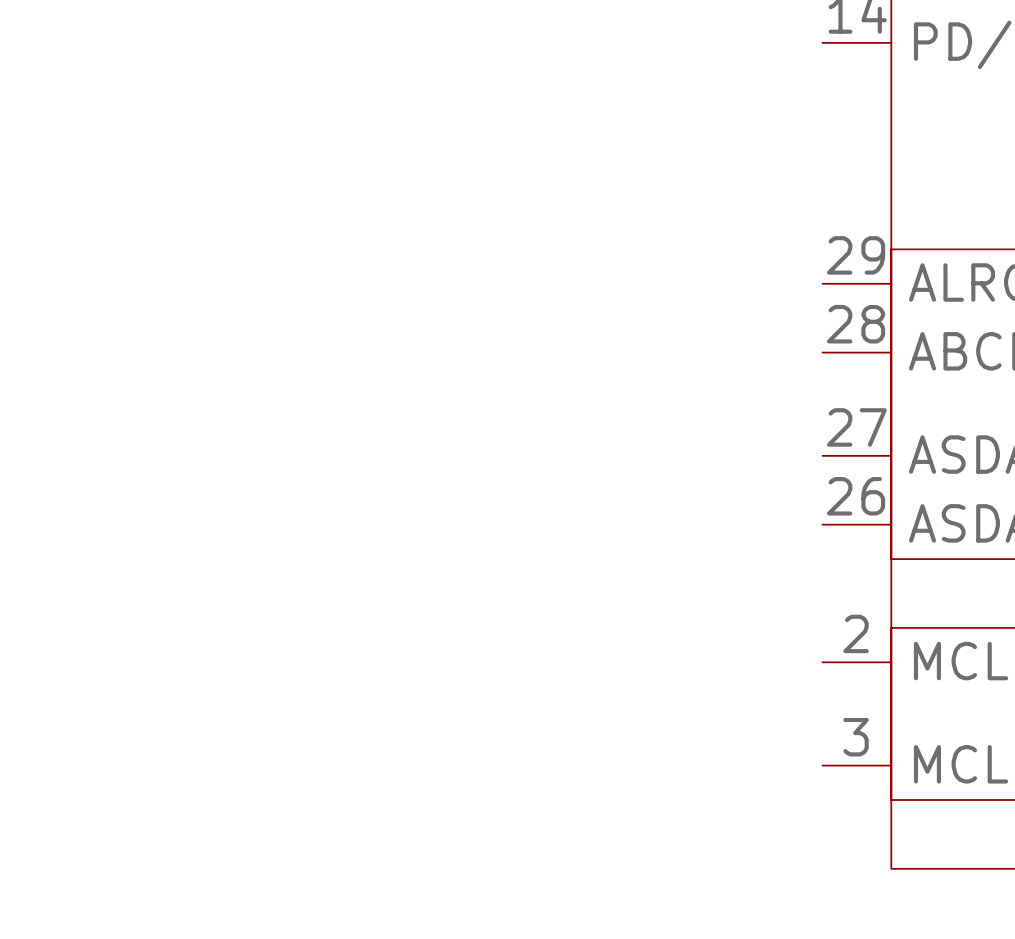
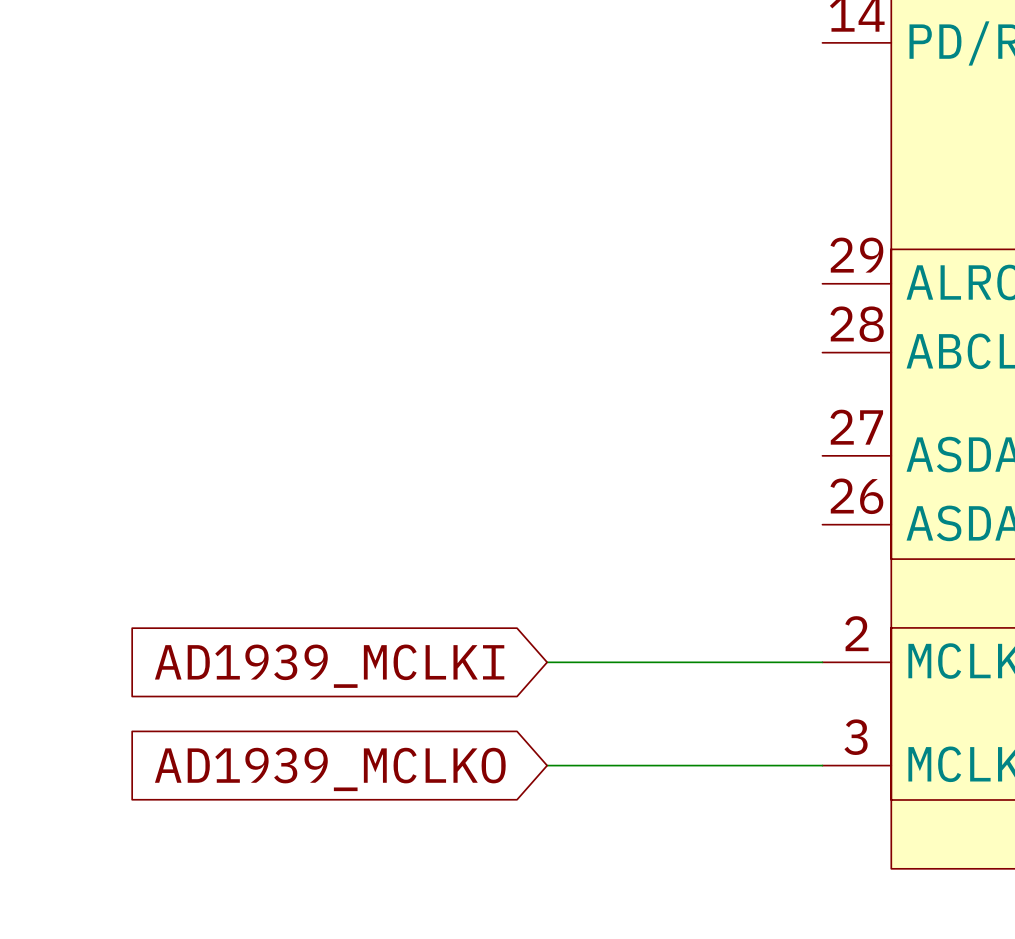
wire: none -> (547, 662) (822, 662)
global label: none -> AD1939_MCLKI (329, 666)
wire: none -> (547, 765) (822, 765)
global label: none -> AD1939_MCLKO (330, 769)

